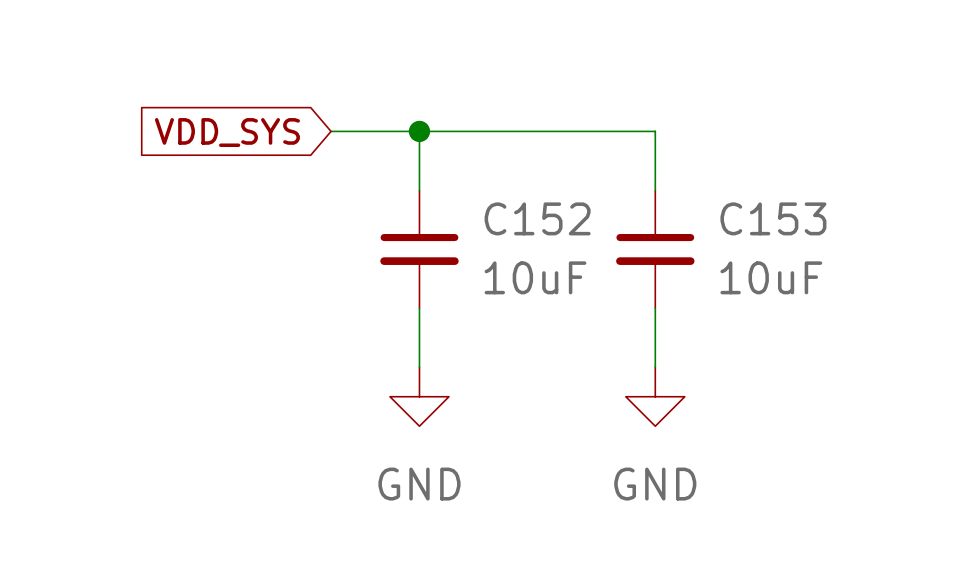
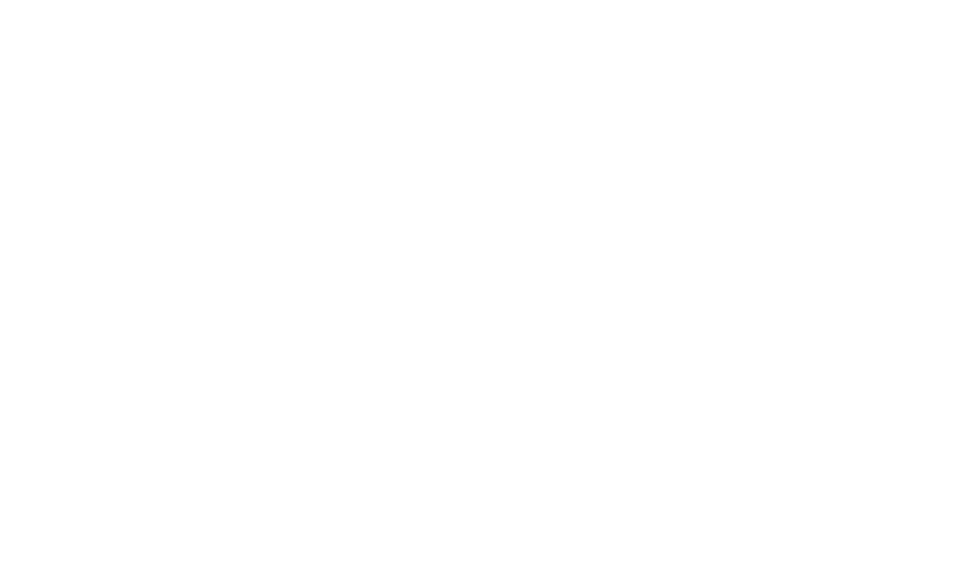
wire: (331, 131) (655, 131) (655, 190) -> none
wire: (419, 131) (419, 190) -> none
junction: (419, 131) -> none
global label: VDD_SYS (227, 132) -> none
C152: 10uF (419, 249) -> none
C153: 10uF (655, 249) -> none
wire: (419, 308) (419, 367) -> none
wire: (655, 308) (655, 367) -> none
power symbol: GND (419, 396) -> none
power symbol: GND (655, 396) -> none

